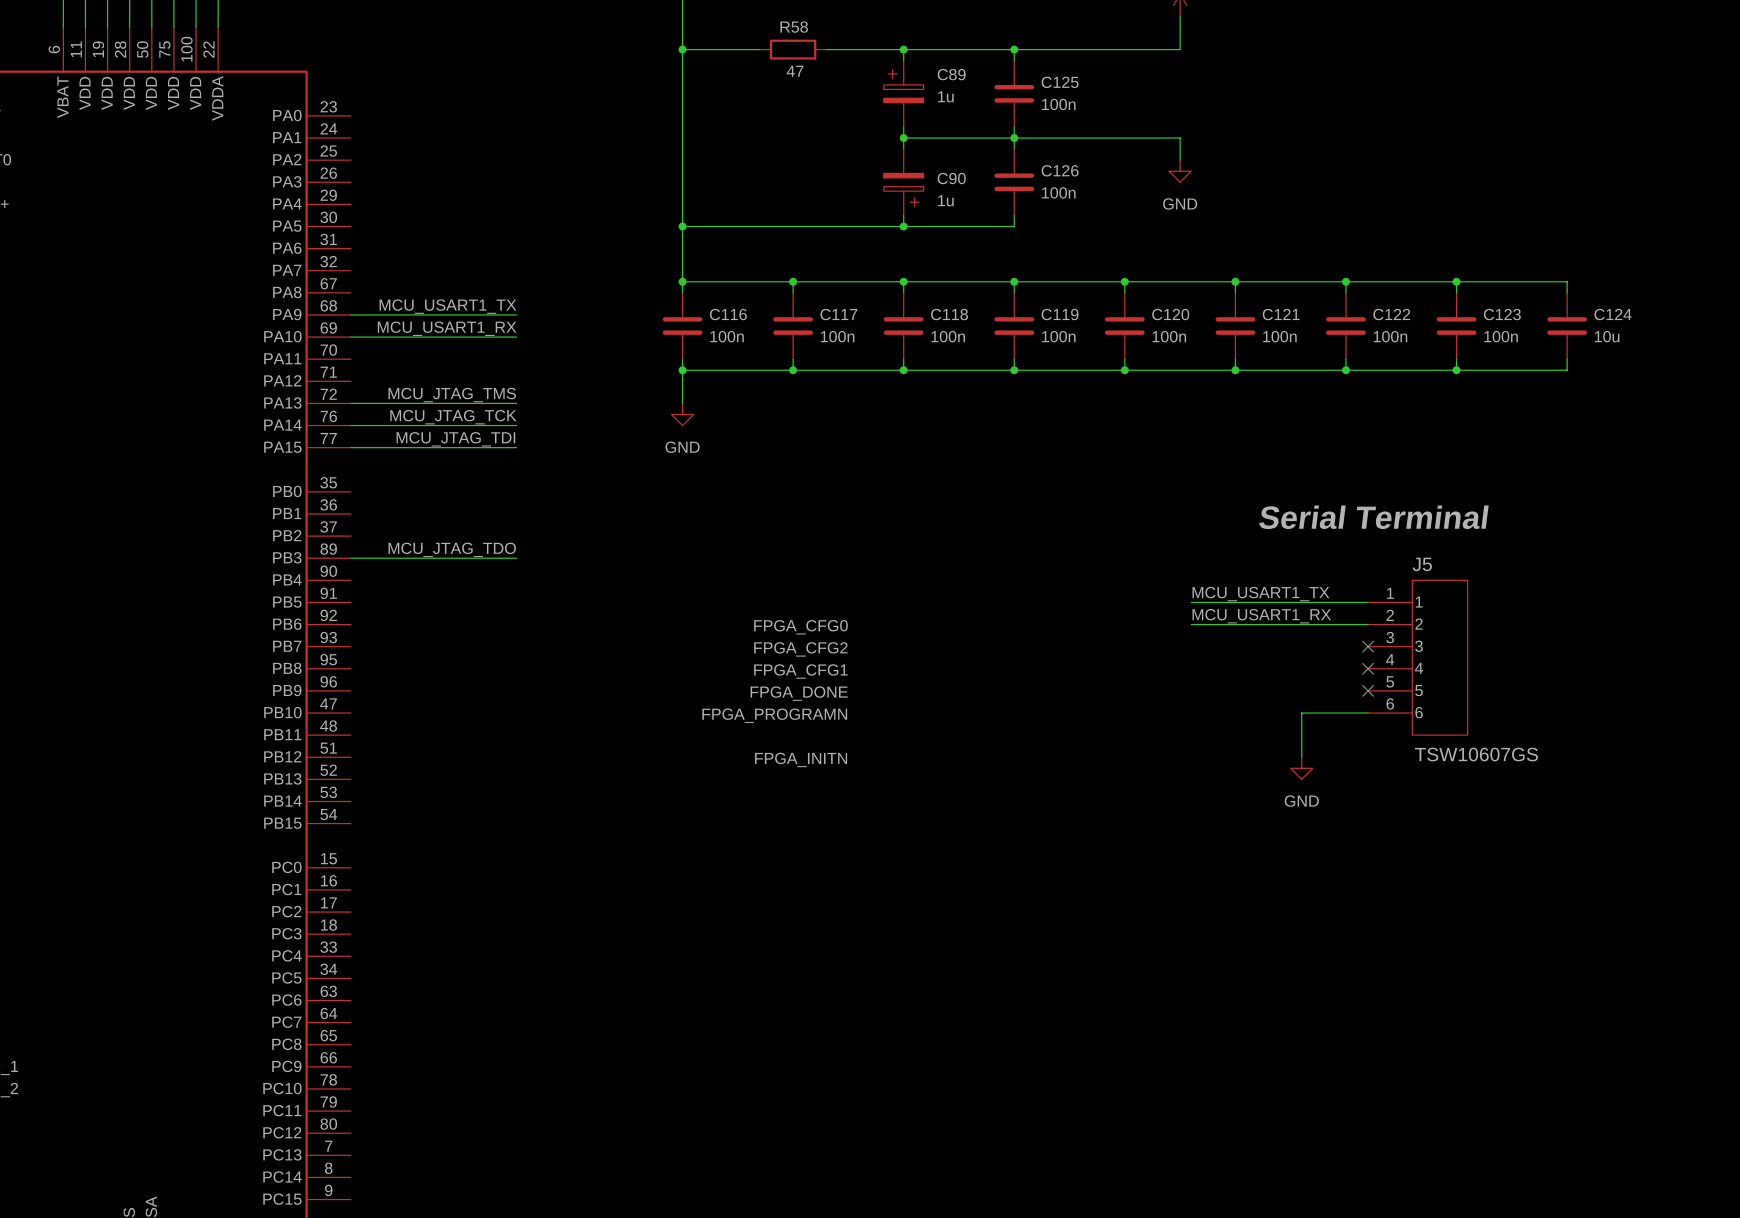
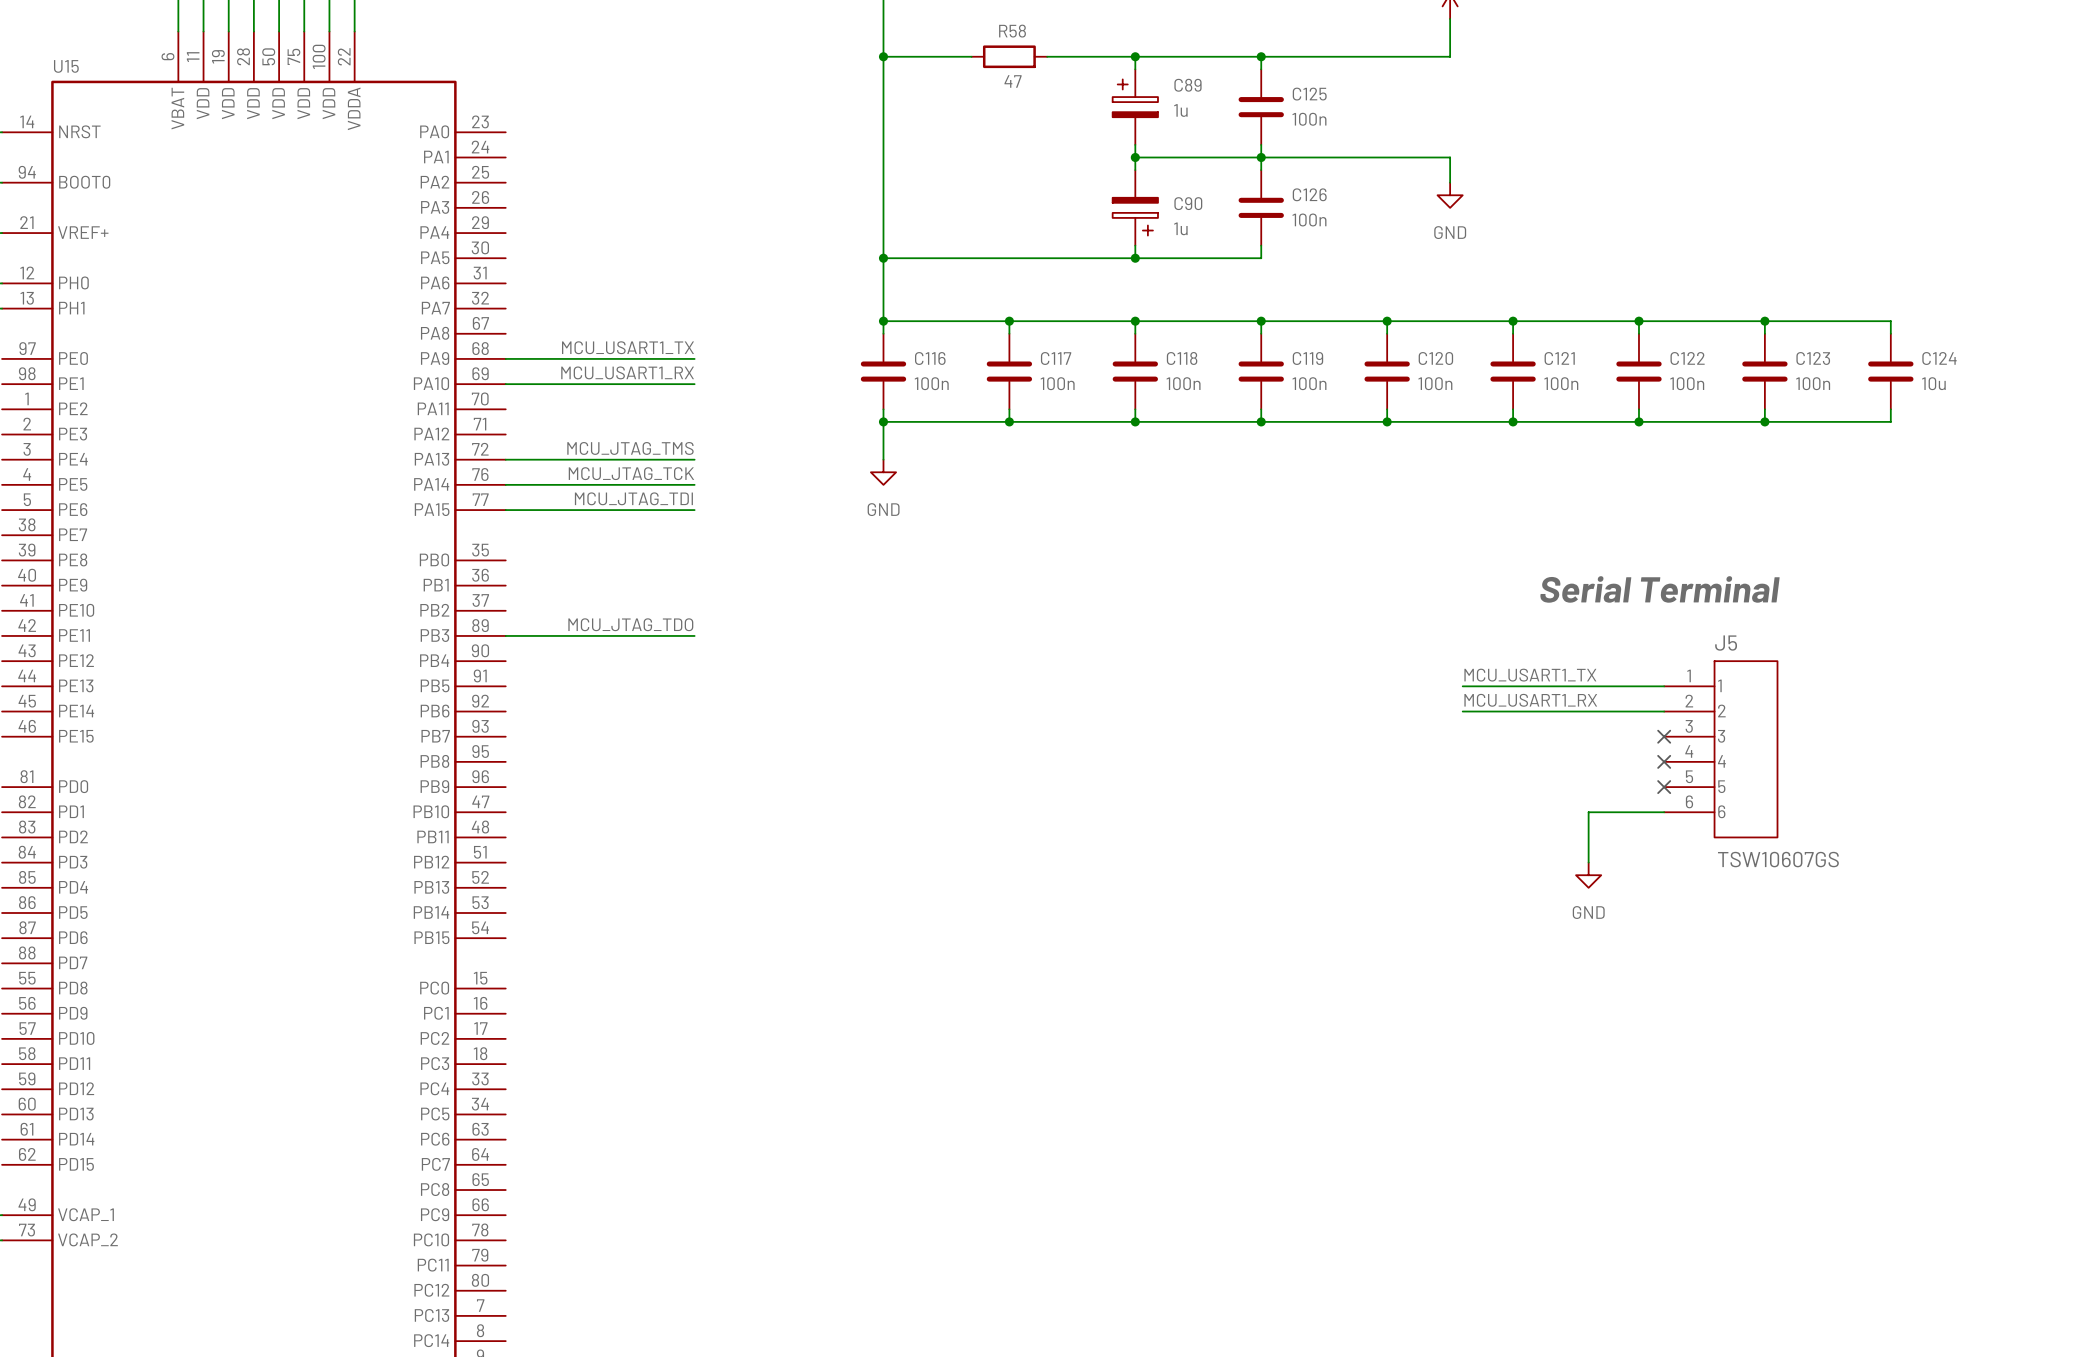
label: FPGA_CFG0 (800, 627) -> none
label: FPGA_CFG2 (800, 649) -> none
label: FPGA_CFG1 (800, 671) -> none
label: FPGA_DONE (799, 693) -> none
label: FPGA_PROGRAMN (774, 715) -> none
label: FPGA_INITN (801, 759) -> none

